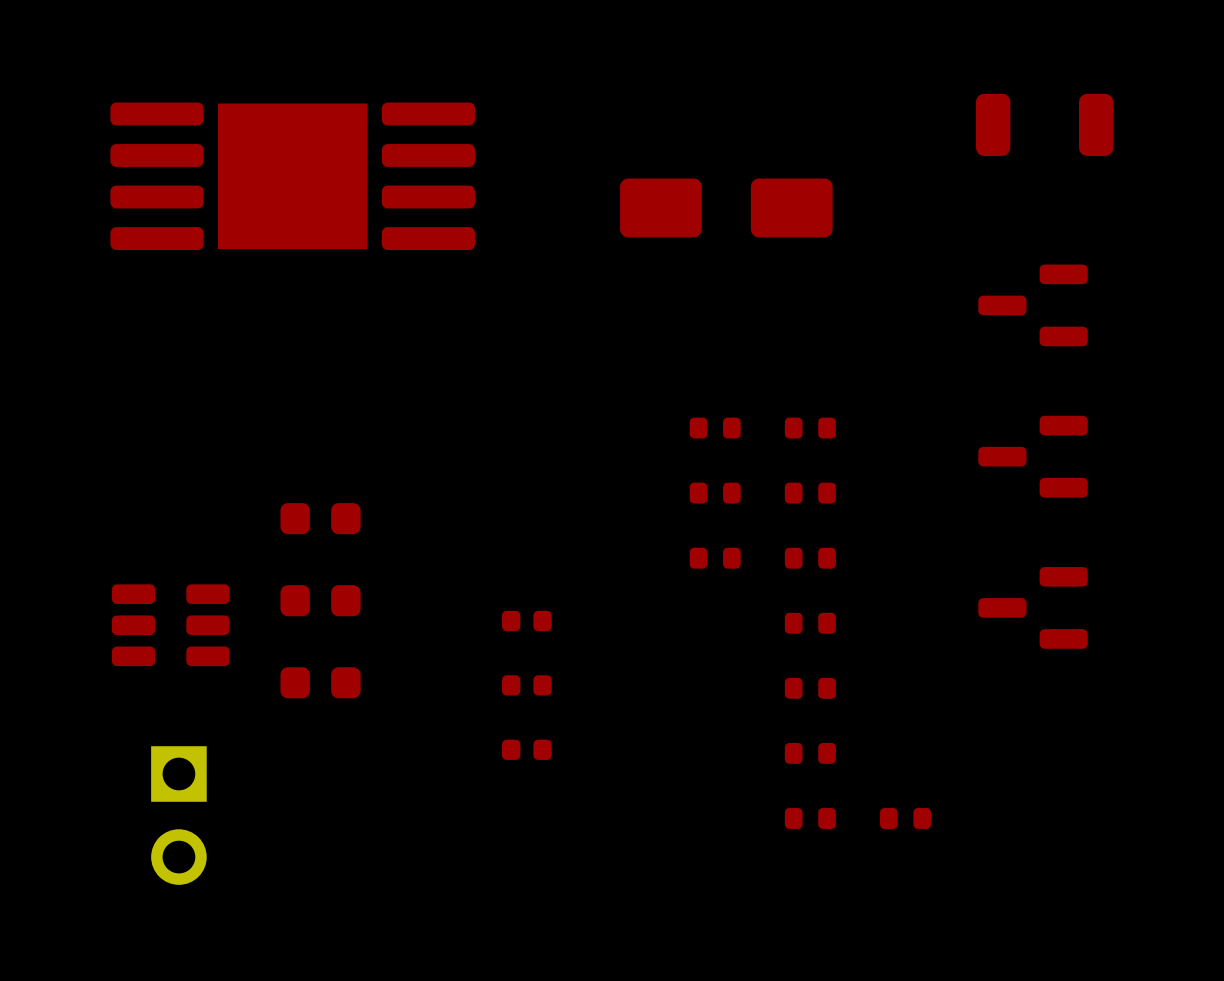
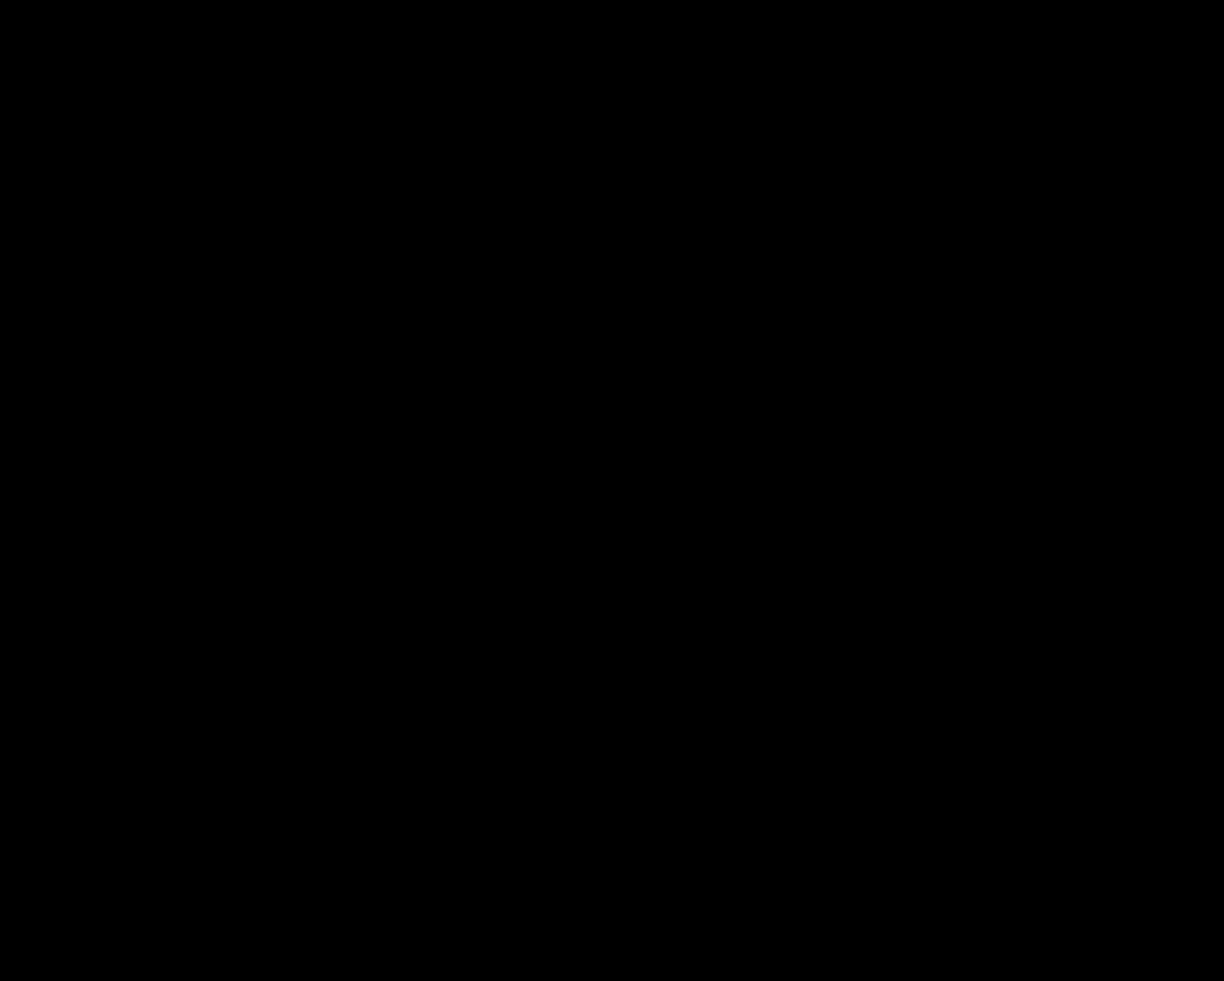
part: (1044, 124) -> none
part: (292, 176) -> none
part: (726, 207) -> none
part: (1033, 305) -> none
part: (715, 428) -> none
part: (810, 428) -> none
part: (1033, 456) -> none
part: (715, 493) -> none
part: (810, 493) -> none
part: (320, 518) -> none
part: (715, 558) -> none
part: (810, 558) -> none
part: (320, 600) -> none
part: (1033, 607) -> none
part: (526, 620) -> none
part: (810, 623) -> none
part: (170, 625) -> none
part: (320, 682) -> none
part: (526, 685) -> none
part: (810, 688) -> none
part: (526, 749) -> none
part: (810, 753) -> none
part: (178, 815) -> none
part: (810, 818) -> none
part: (905, 818) -> none

